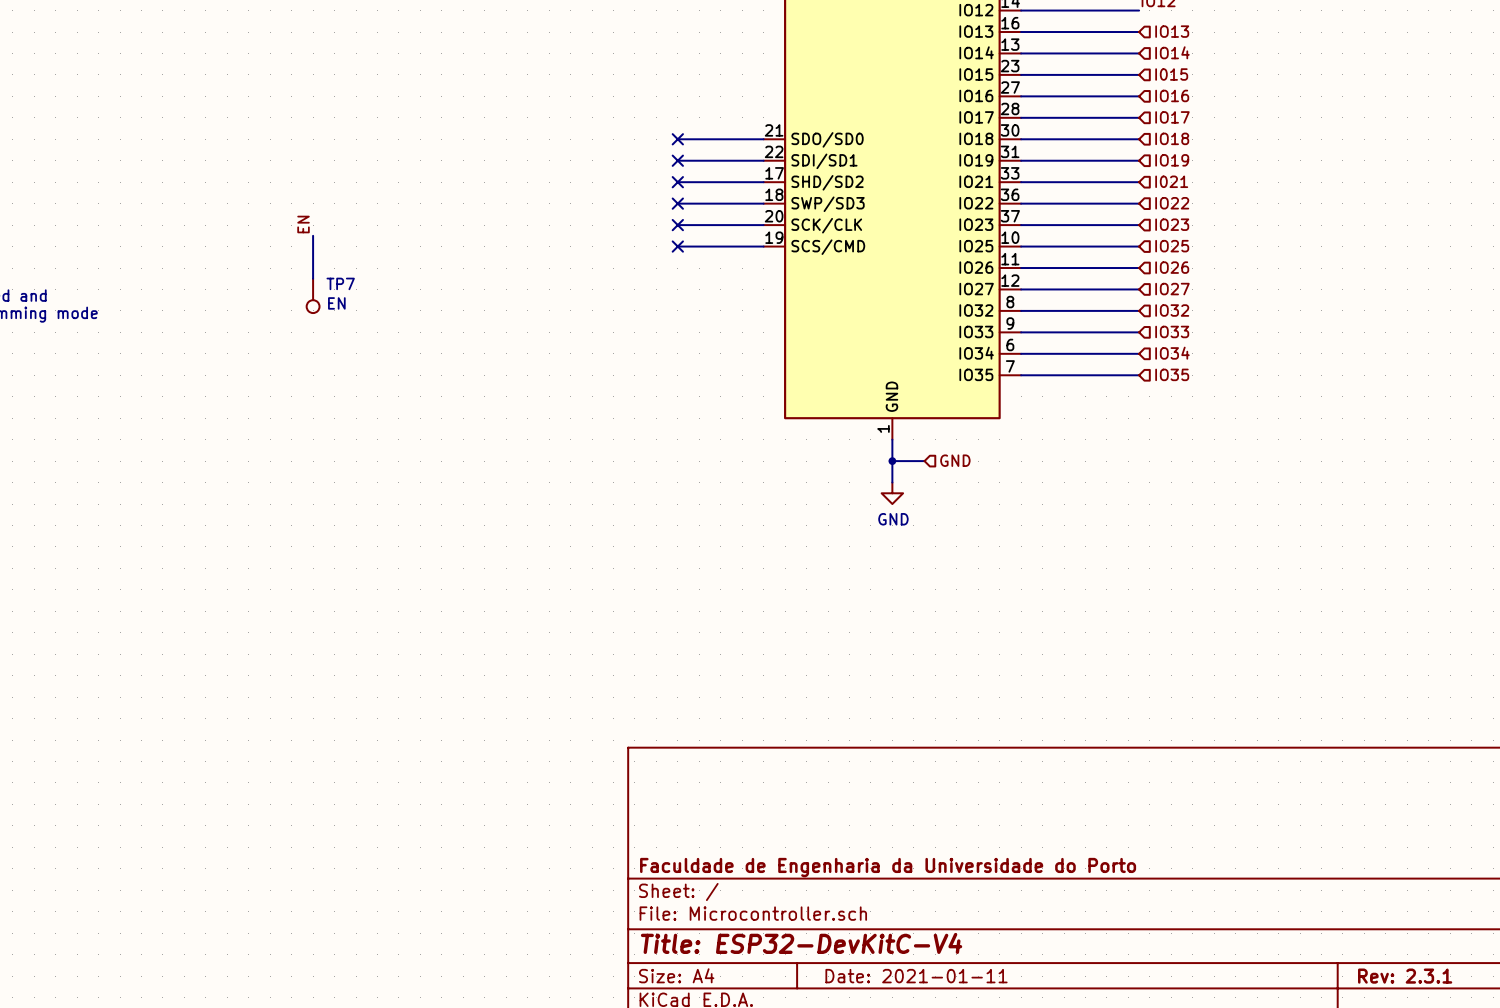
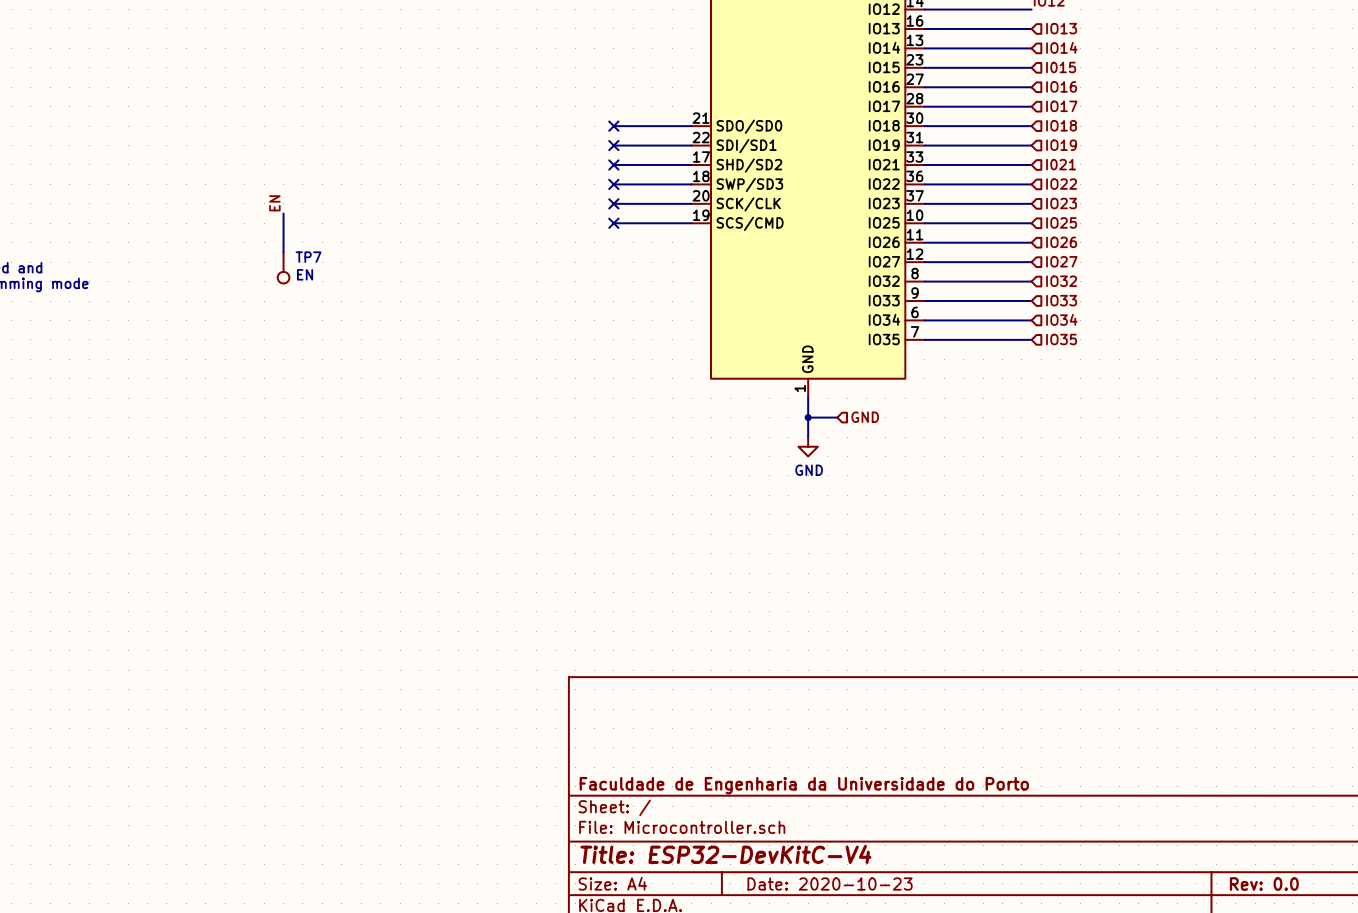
title block: Date: 2021-01-11 (916, 976) -> Date: 2020-10-23 (830, 884)
title block: Rev: 2.3.1 (1405, 976) -> Rev: 0.0 (1264, 884)

